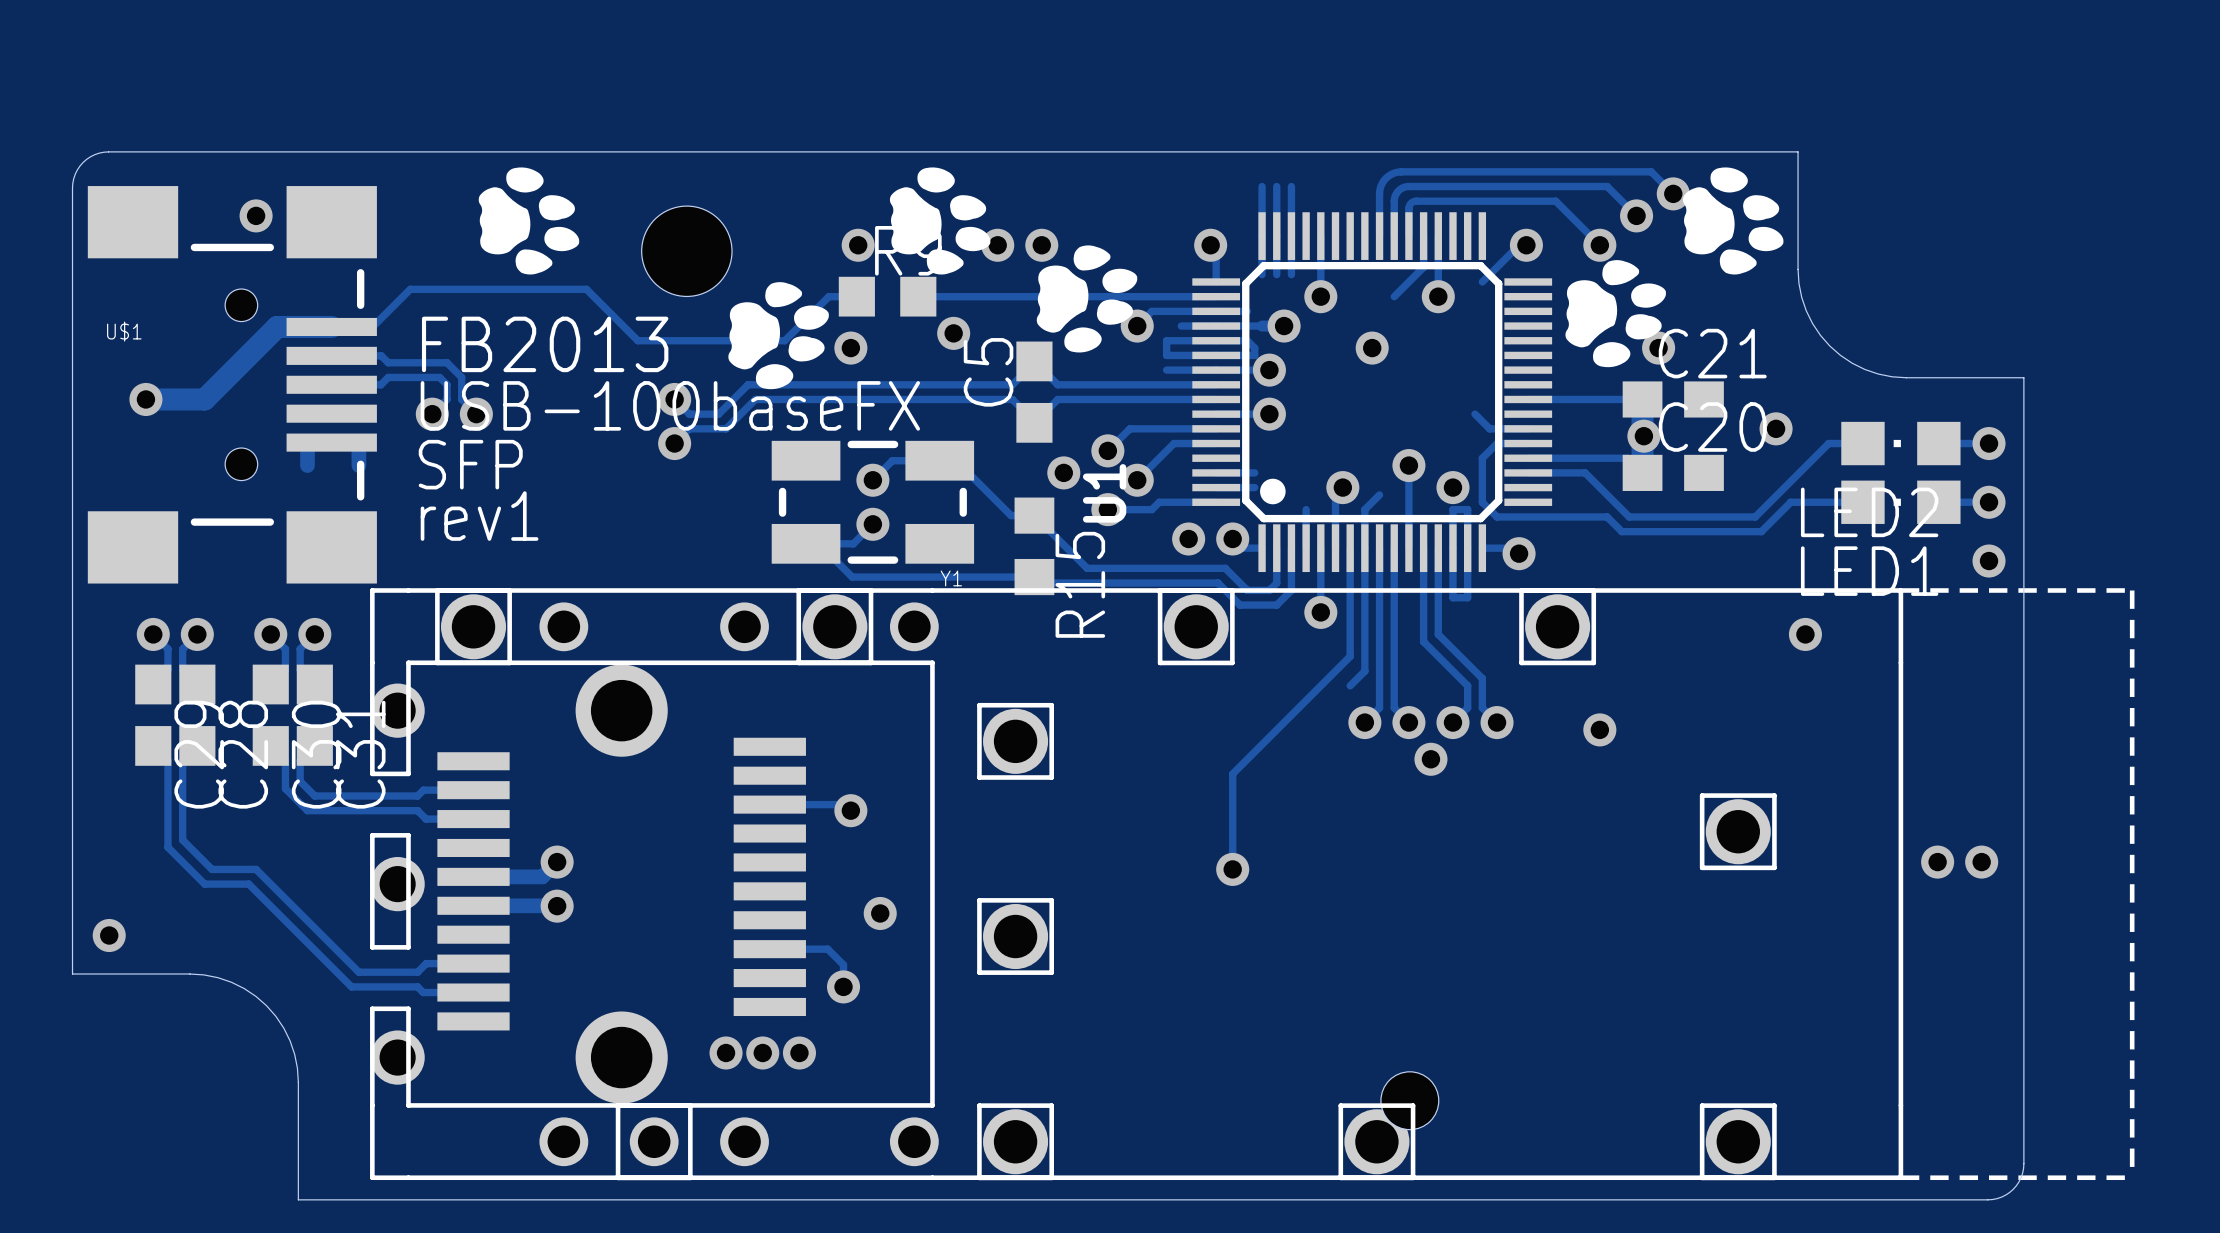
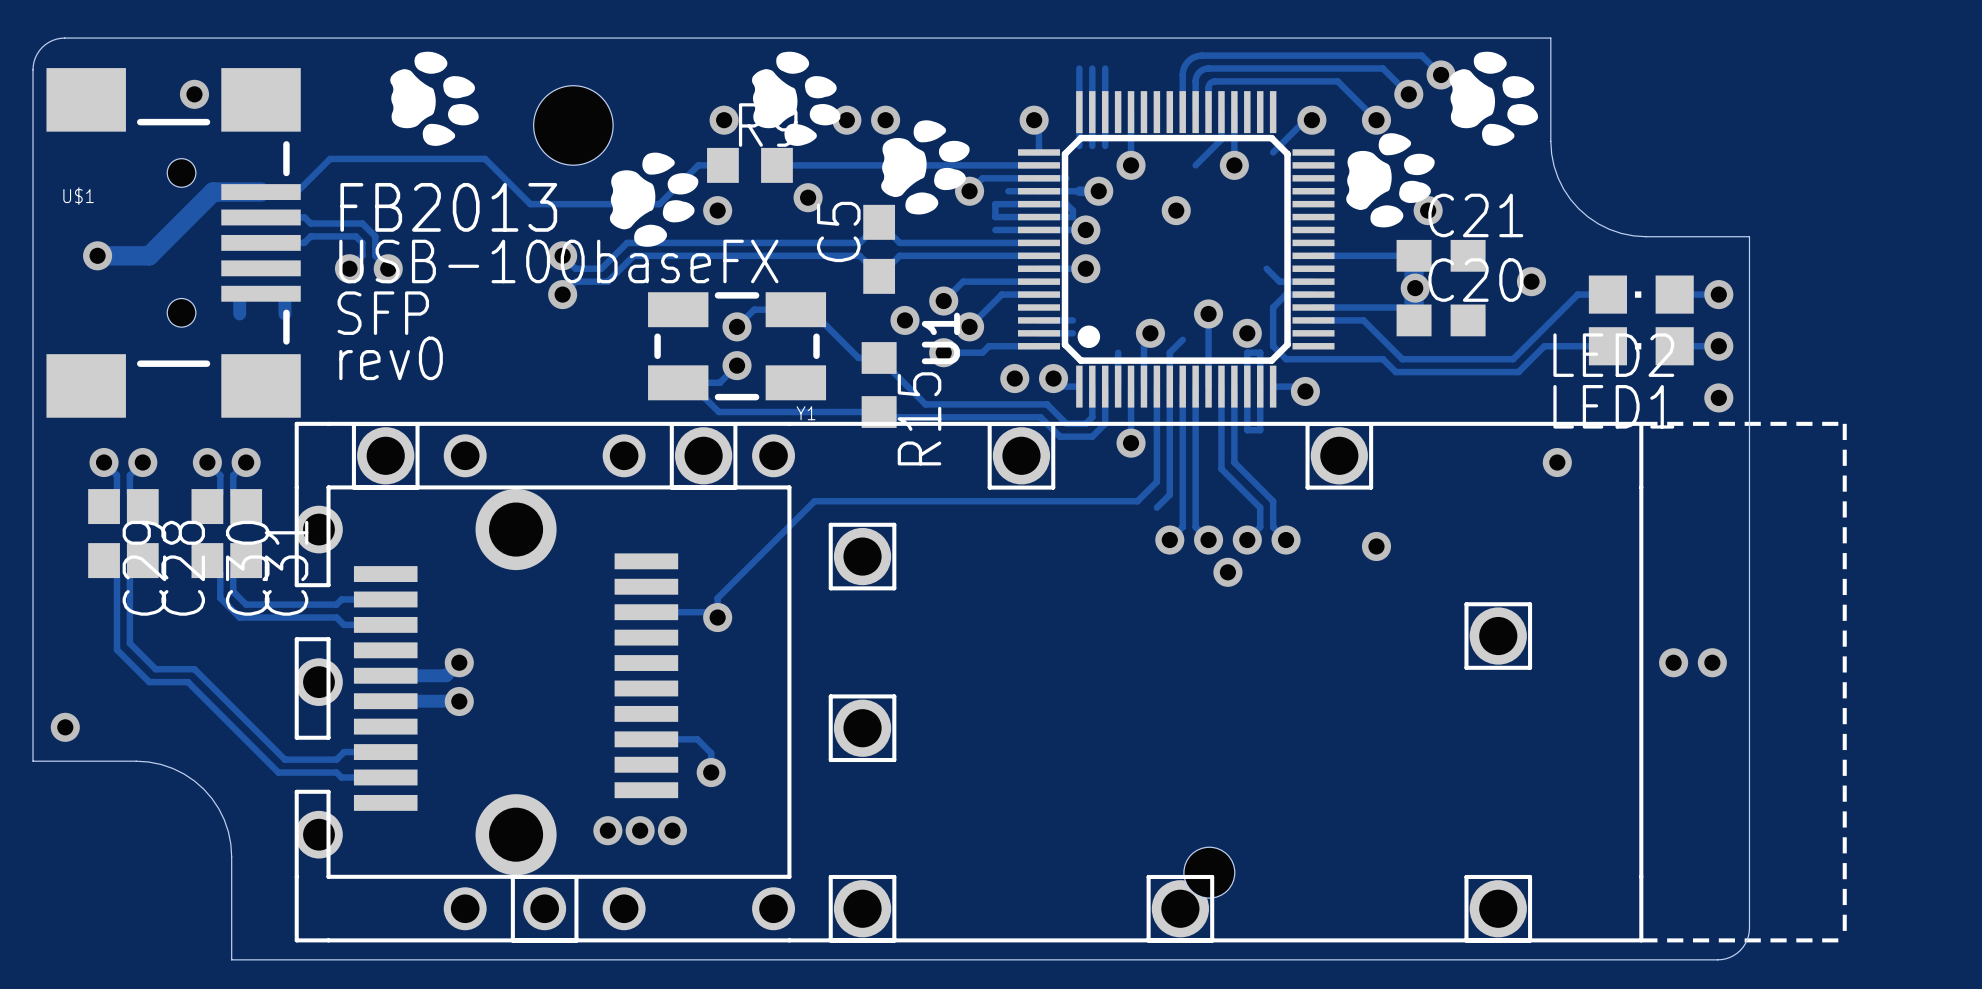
text: rev1 (479, 516) -> rev0 (391, 358)
track: (1328, 678) (1232, 773) (1232, 869) -> (1137, 501) (814, 501) (717, 598) (717, 617)
via: (1232, 869) -> none
via: (880, 913) -> none

